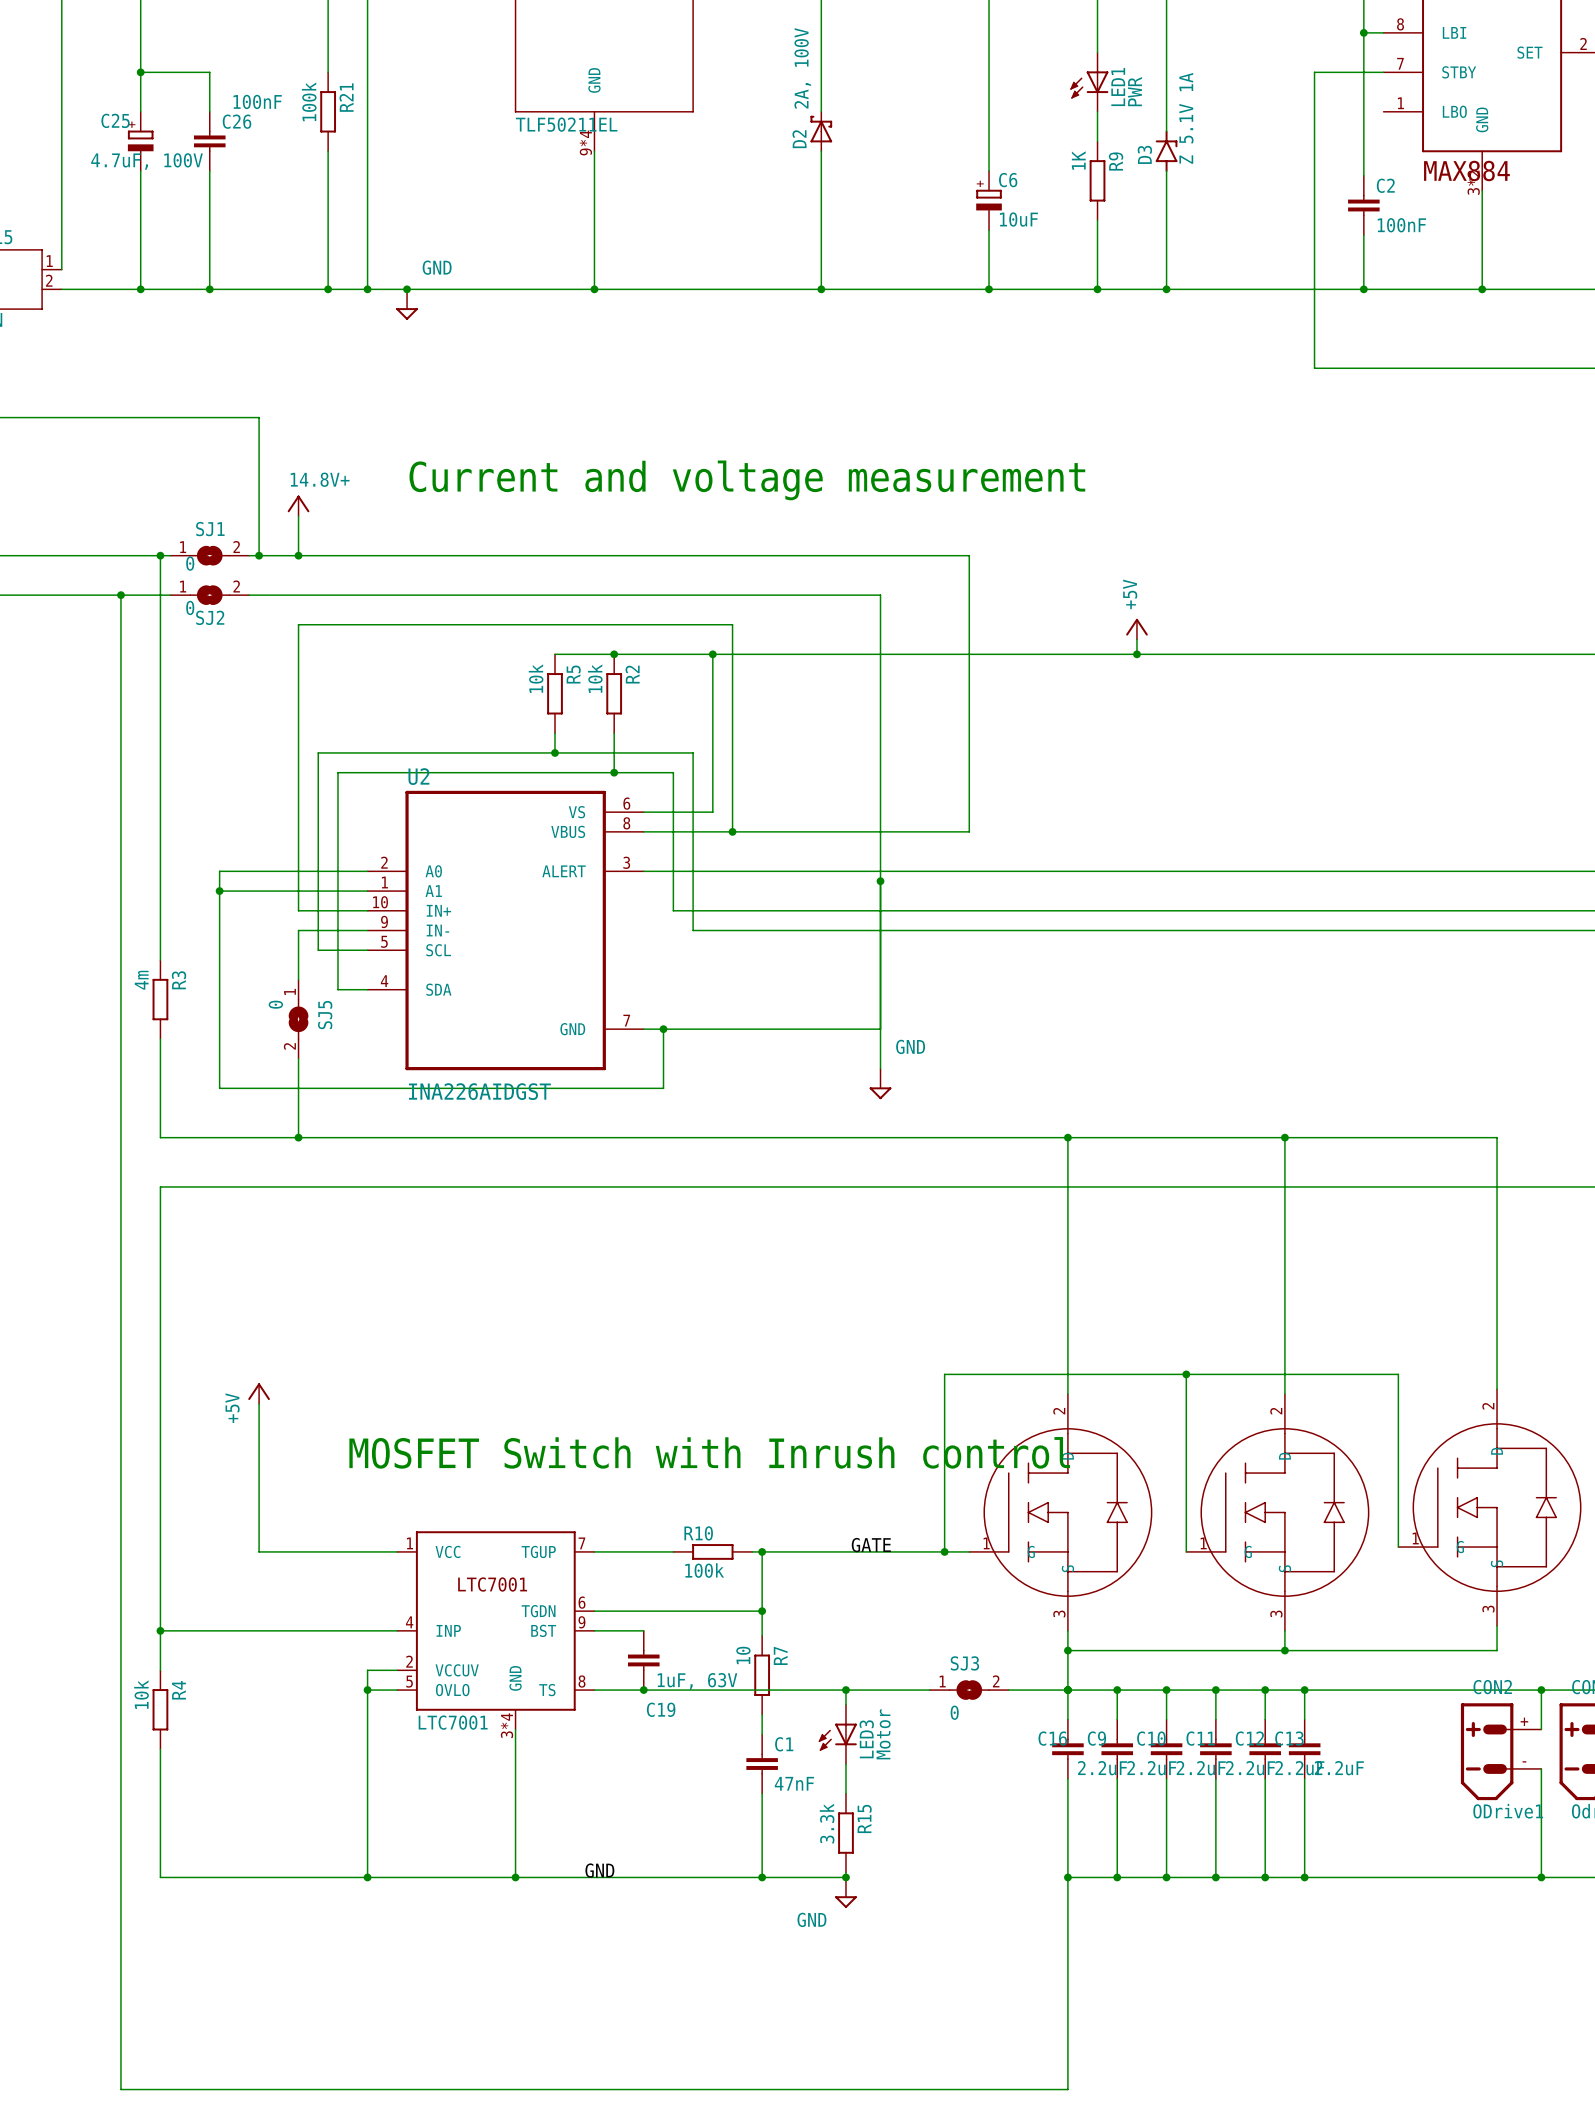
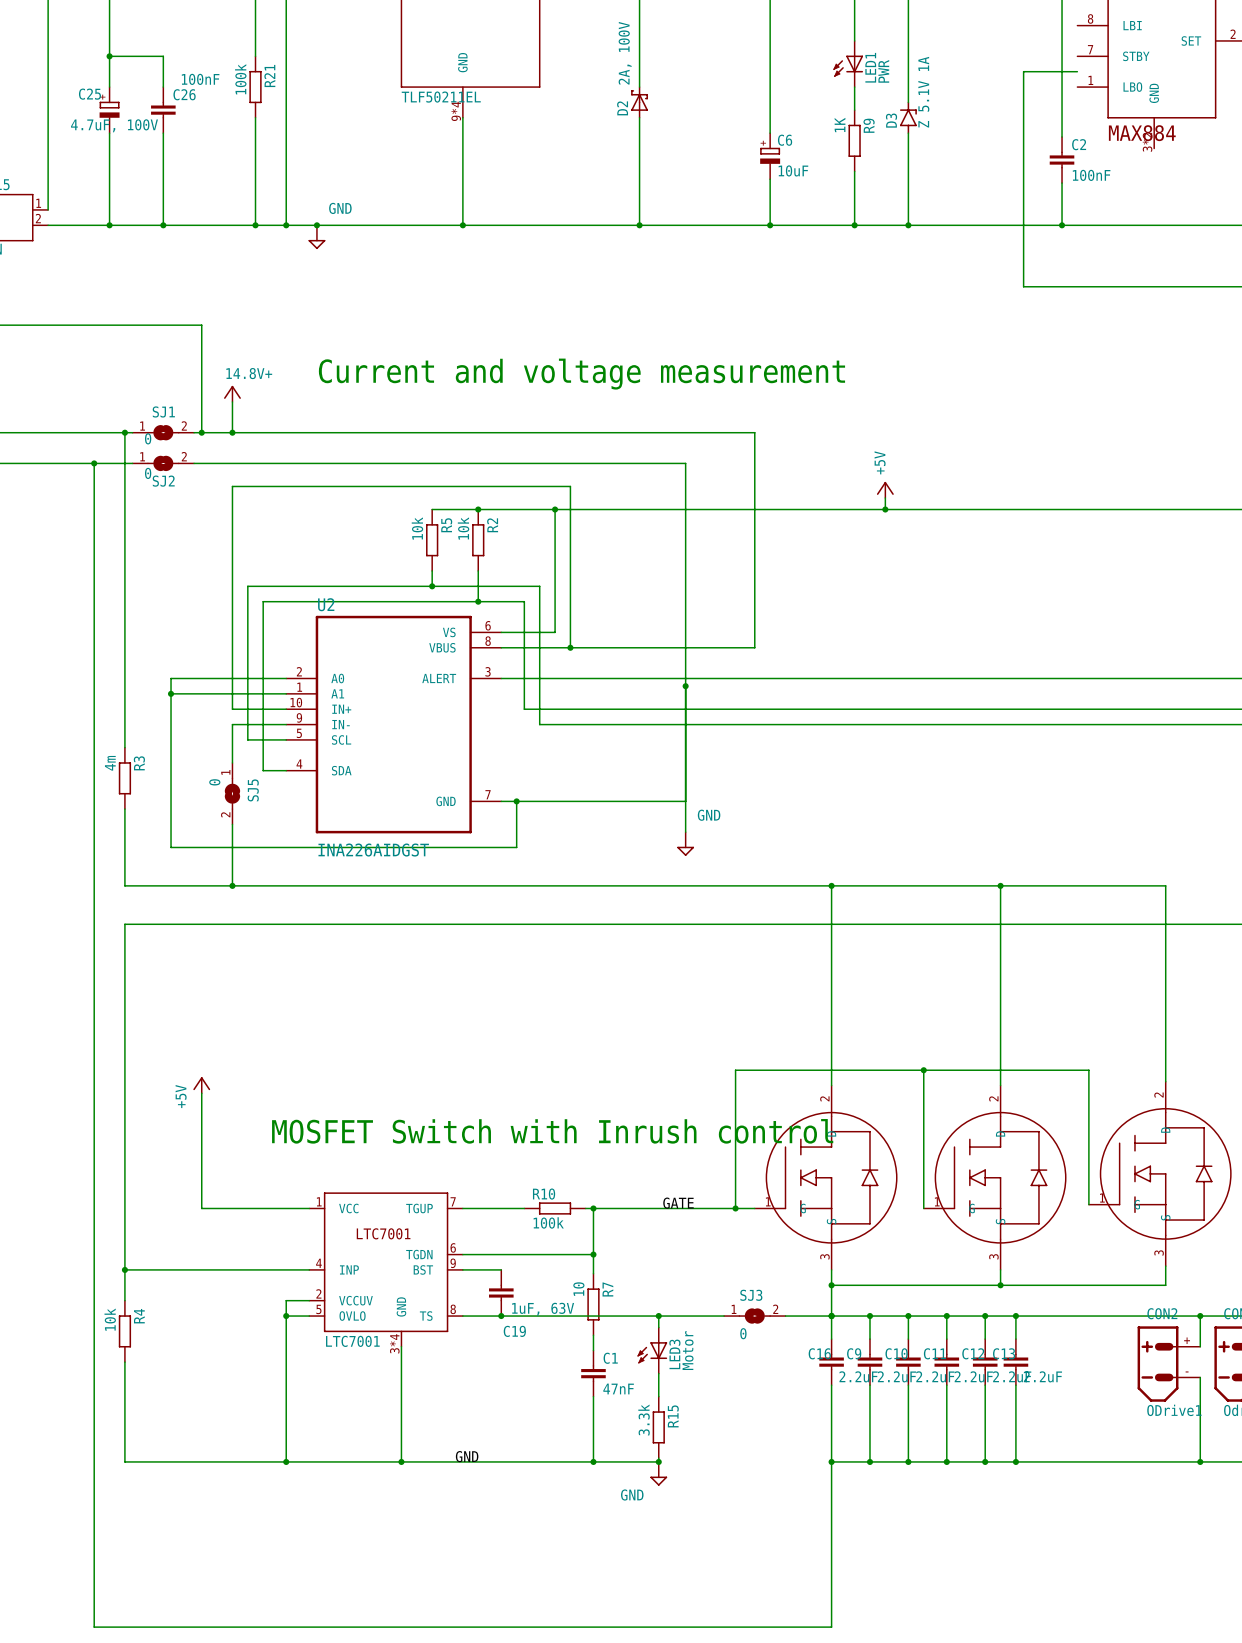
wire: (1363, 32) (1383, 32) -> none
junction: (1363, 32) -> none
wire: (1383, 72) (1314, 72) (1314, 92) -> (1077, 71) (1023, 71)
wire: (1482, 190) (1482, 289) -> none
junction: (1482, 289) -> none

